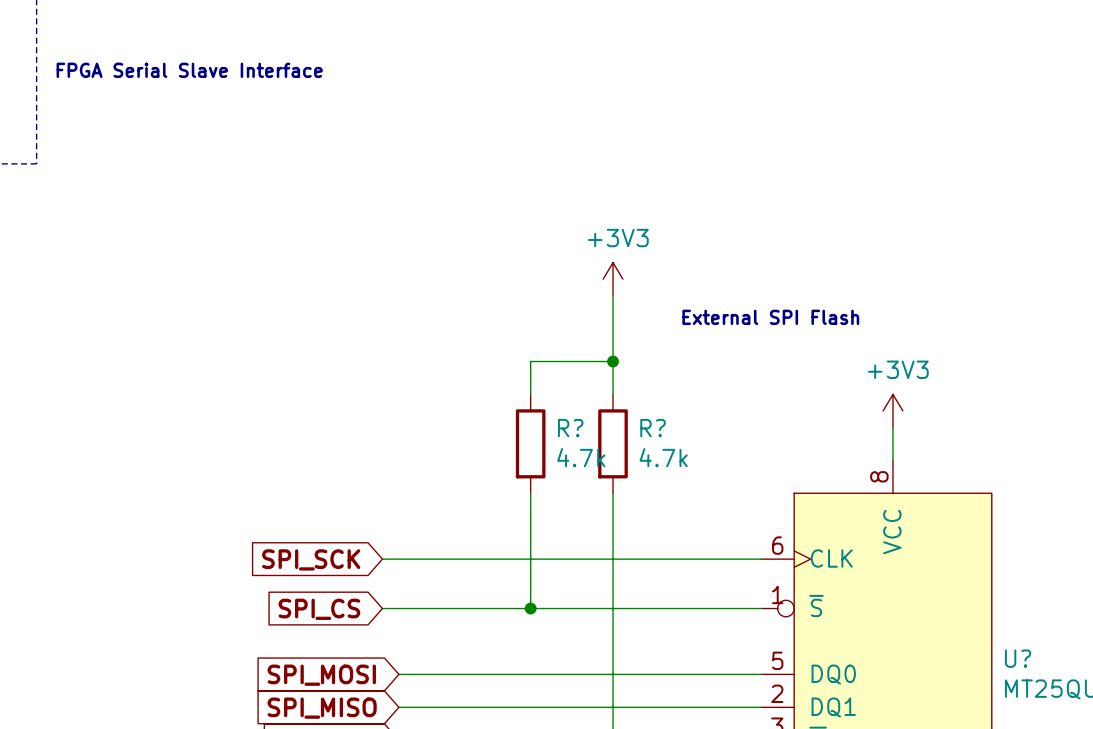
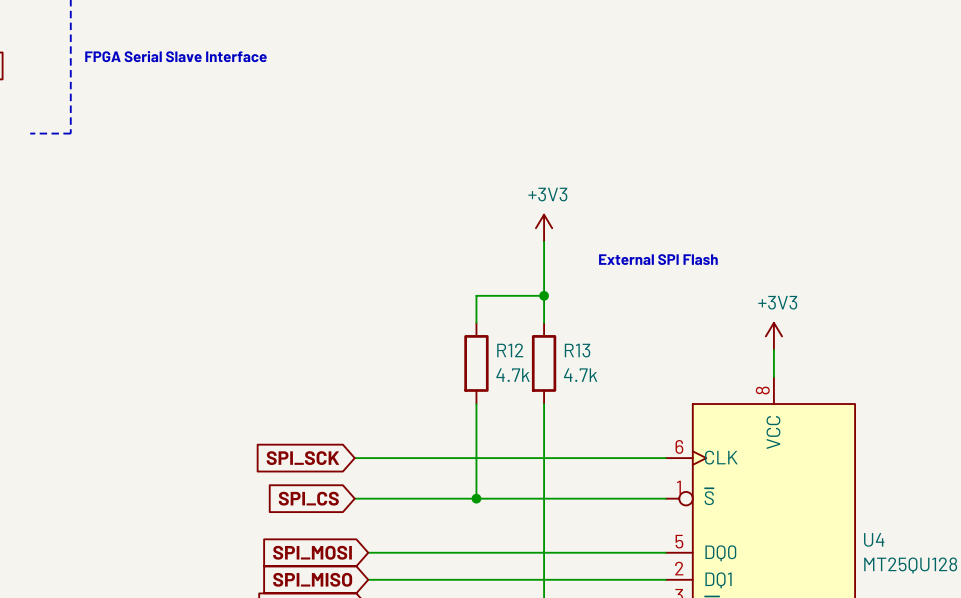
R? name: R? (570, 428) -> R12 (510, 350)
R? name: R? (653, 428) -> R13 (577, 350)
U? name: U? (1018, 658) -> U4 (874, 539)

